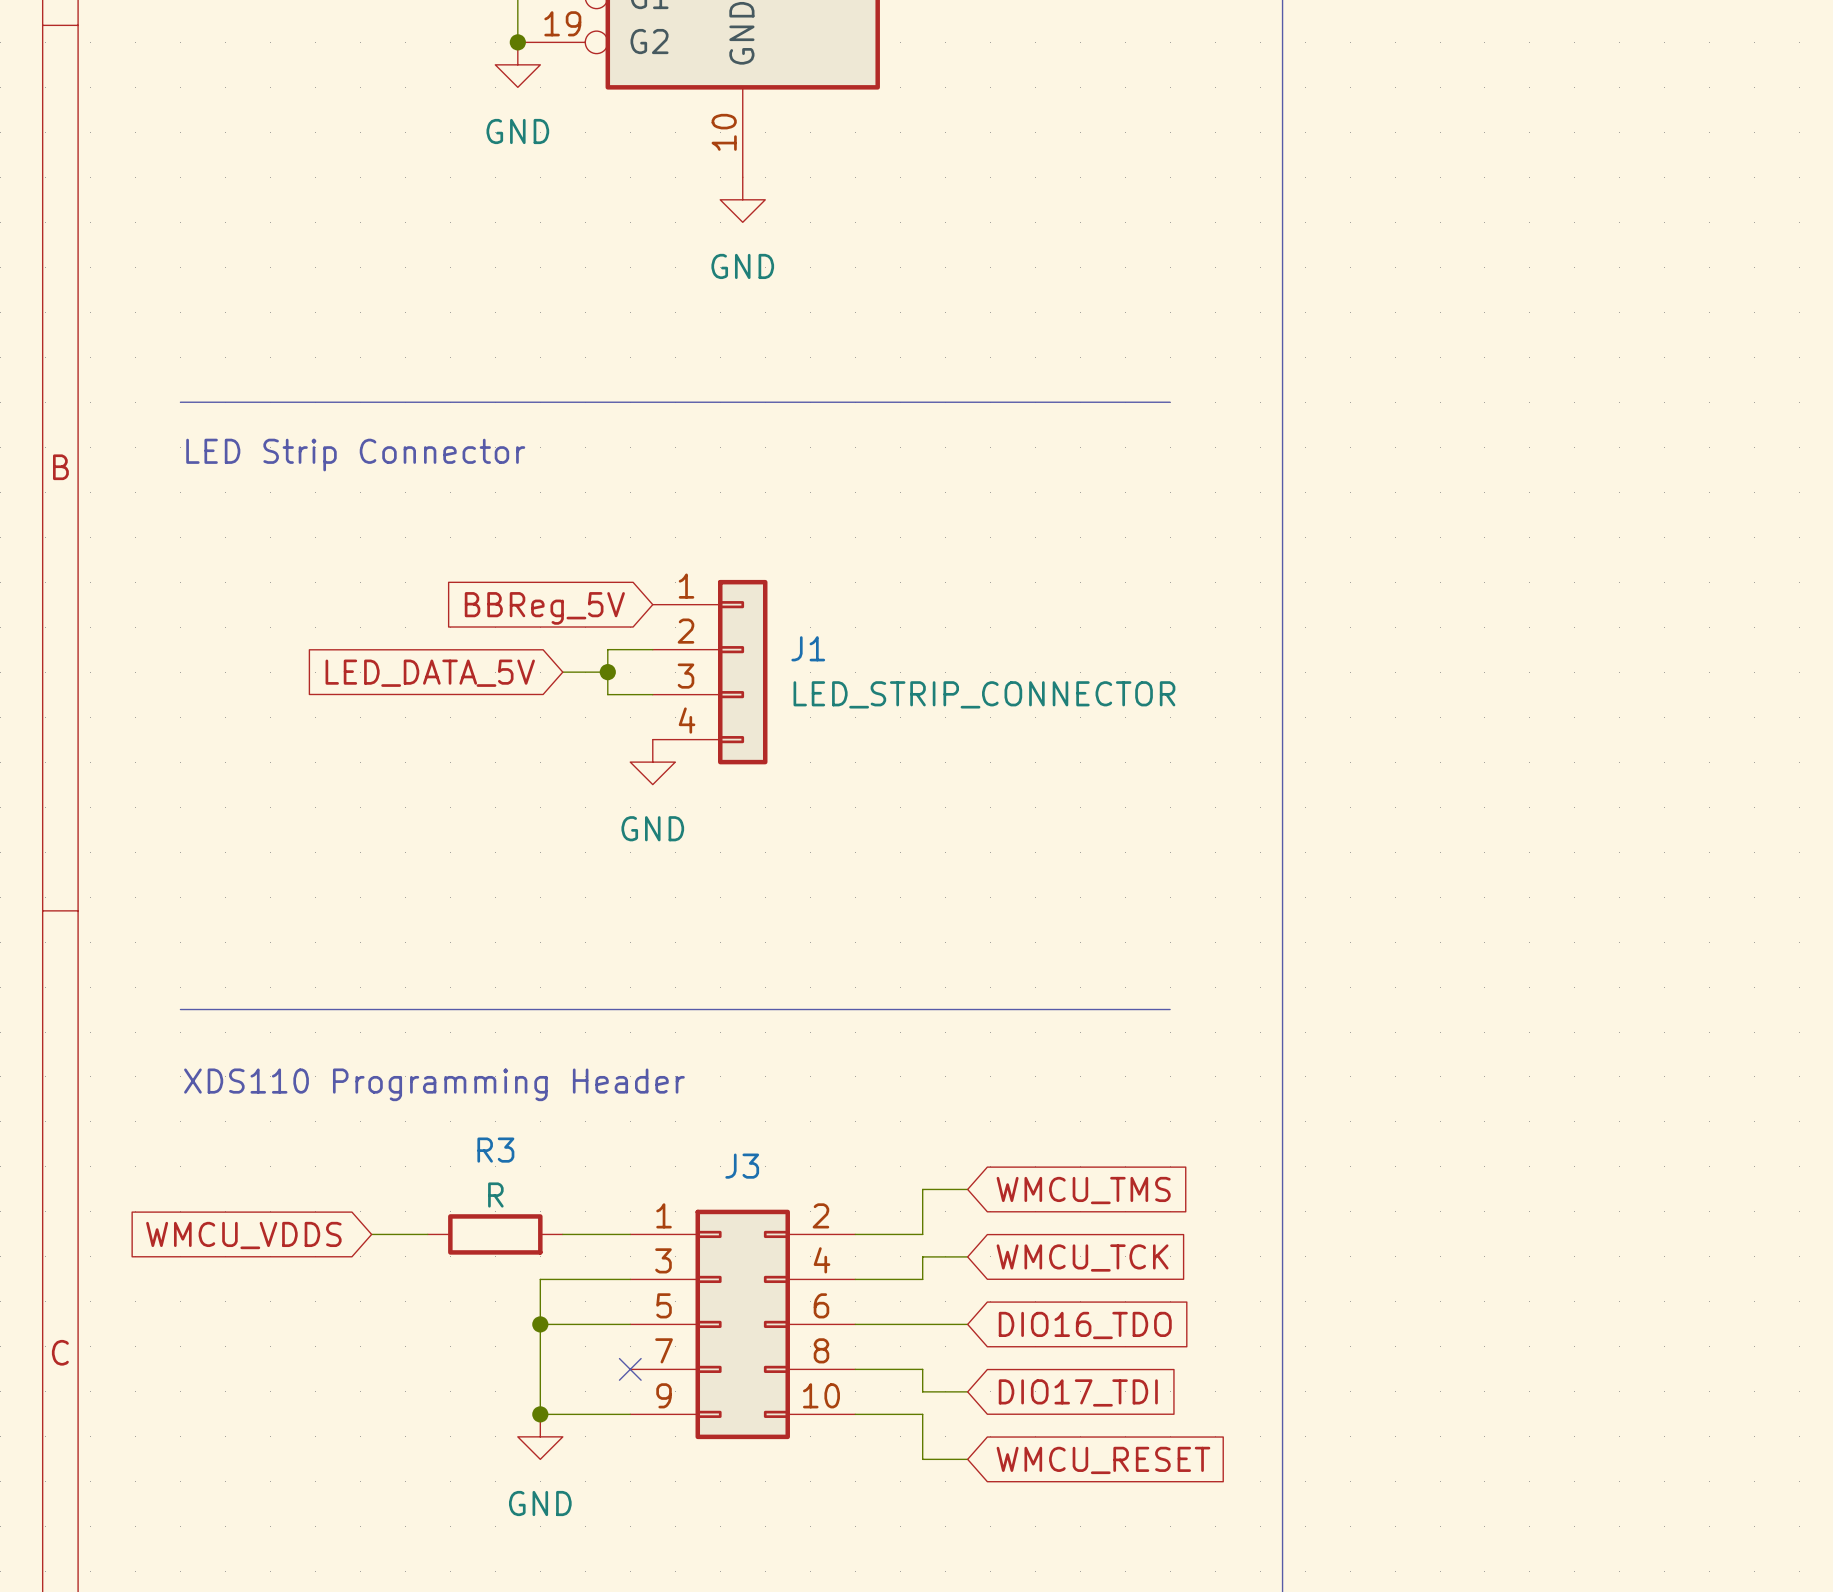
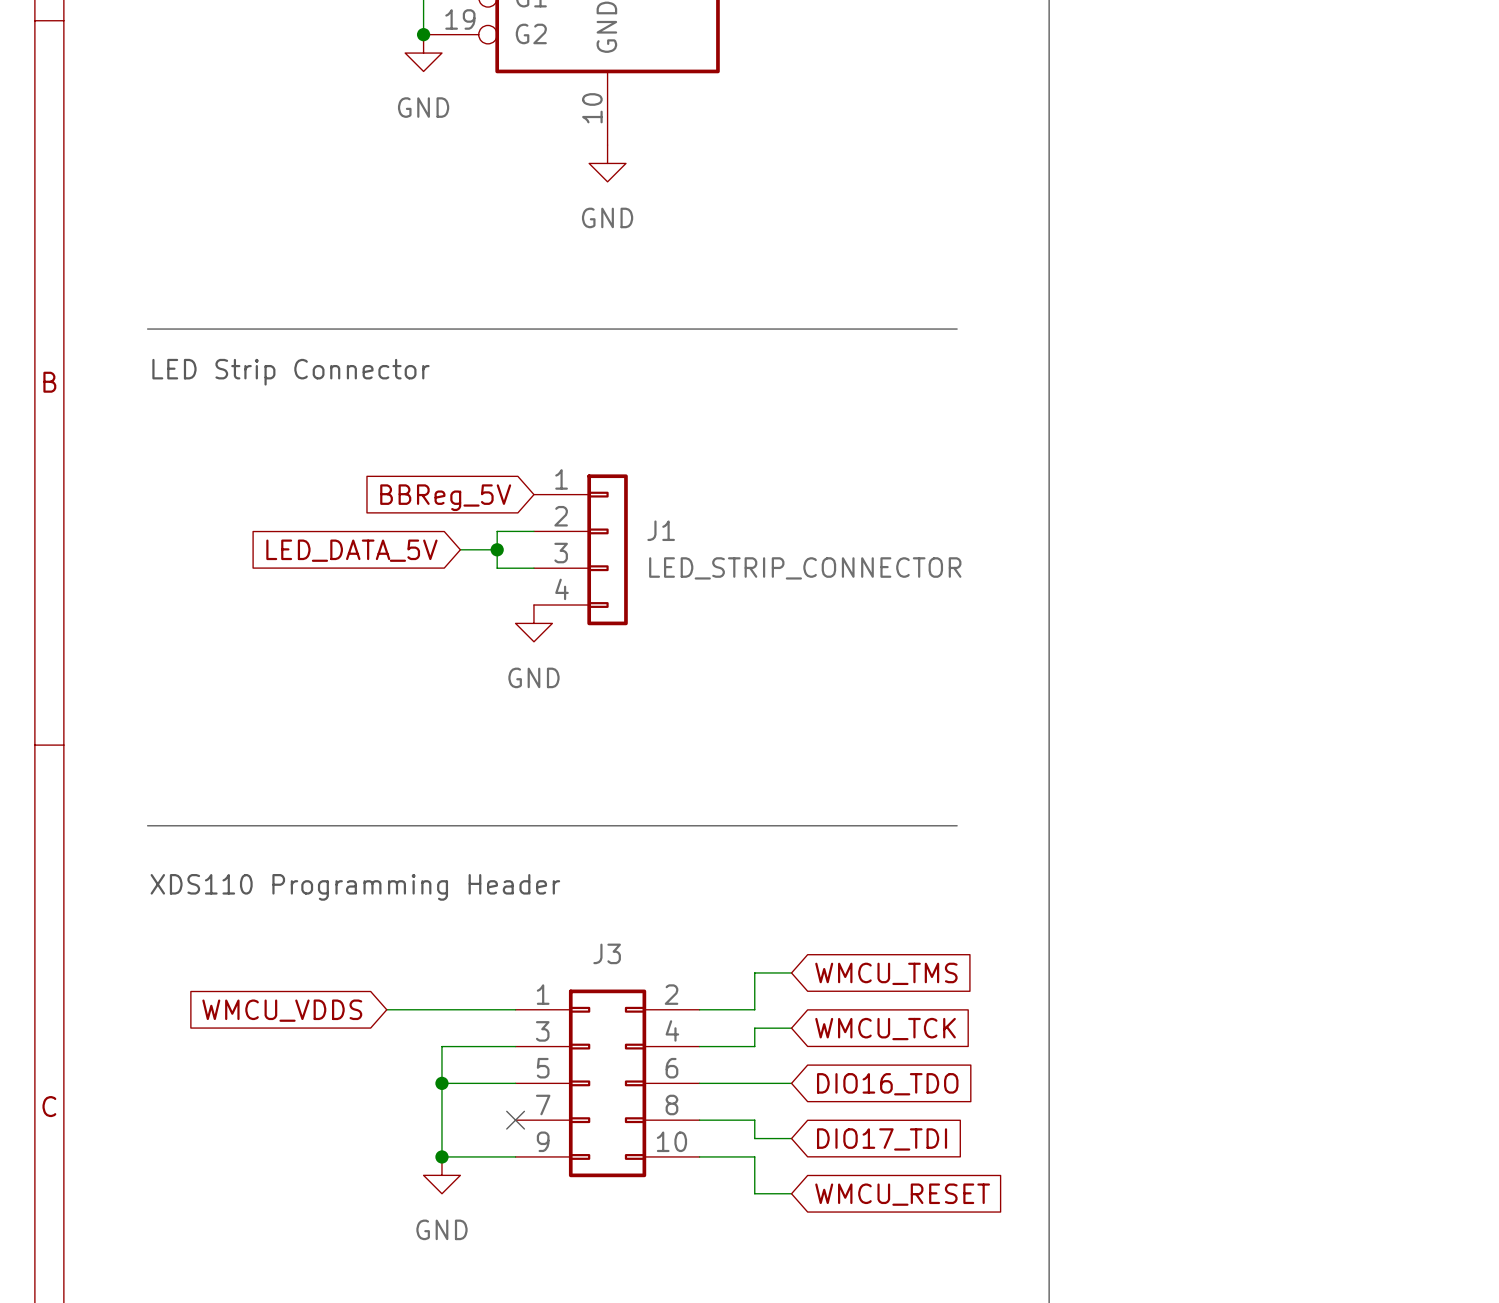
wire: (371, 1234) (427, 1234) -> none
wire: none -> (386, 1009) (460, 1009)
R3: R (495, 1234) -> none
global label position: WMCU_VDDS (243, 1235) -> WMCU_VDDS (282, 1010)

